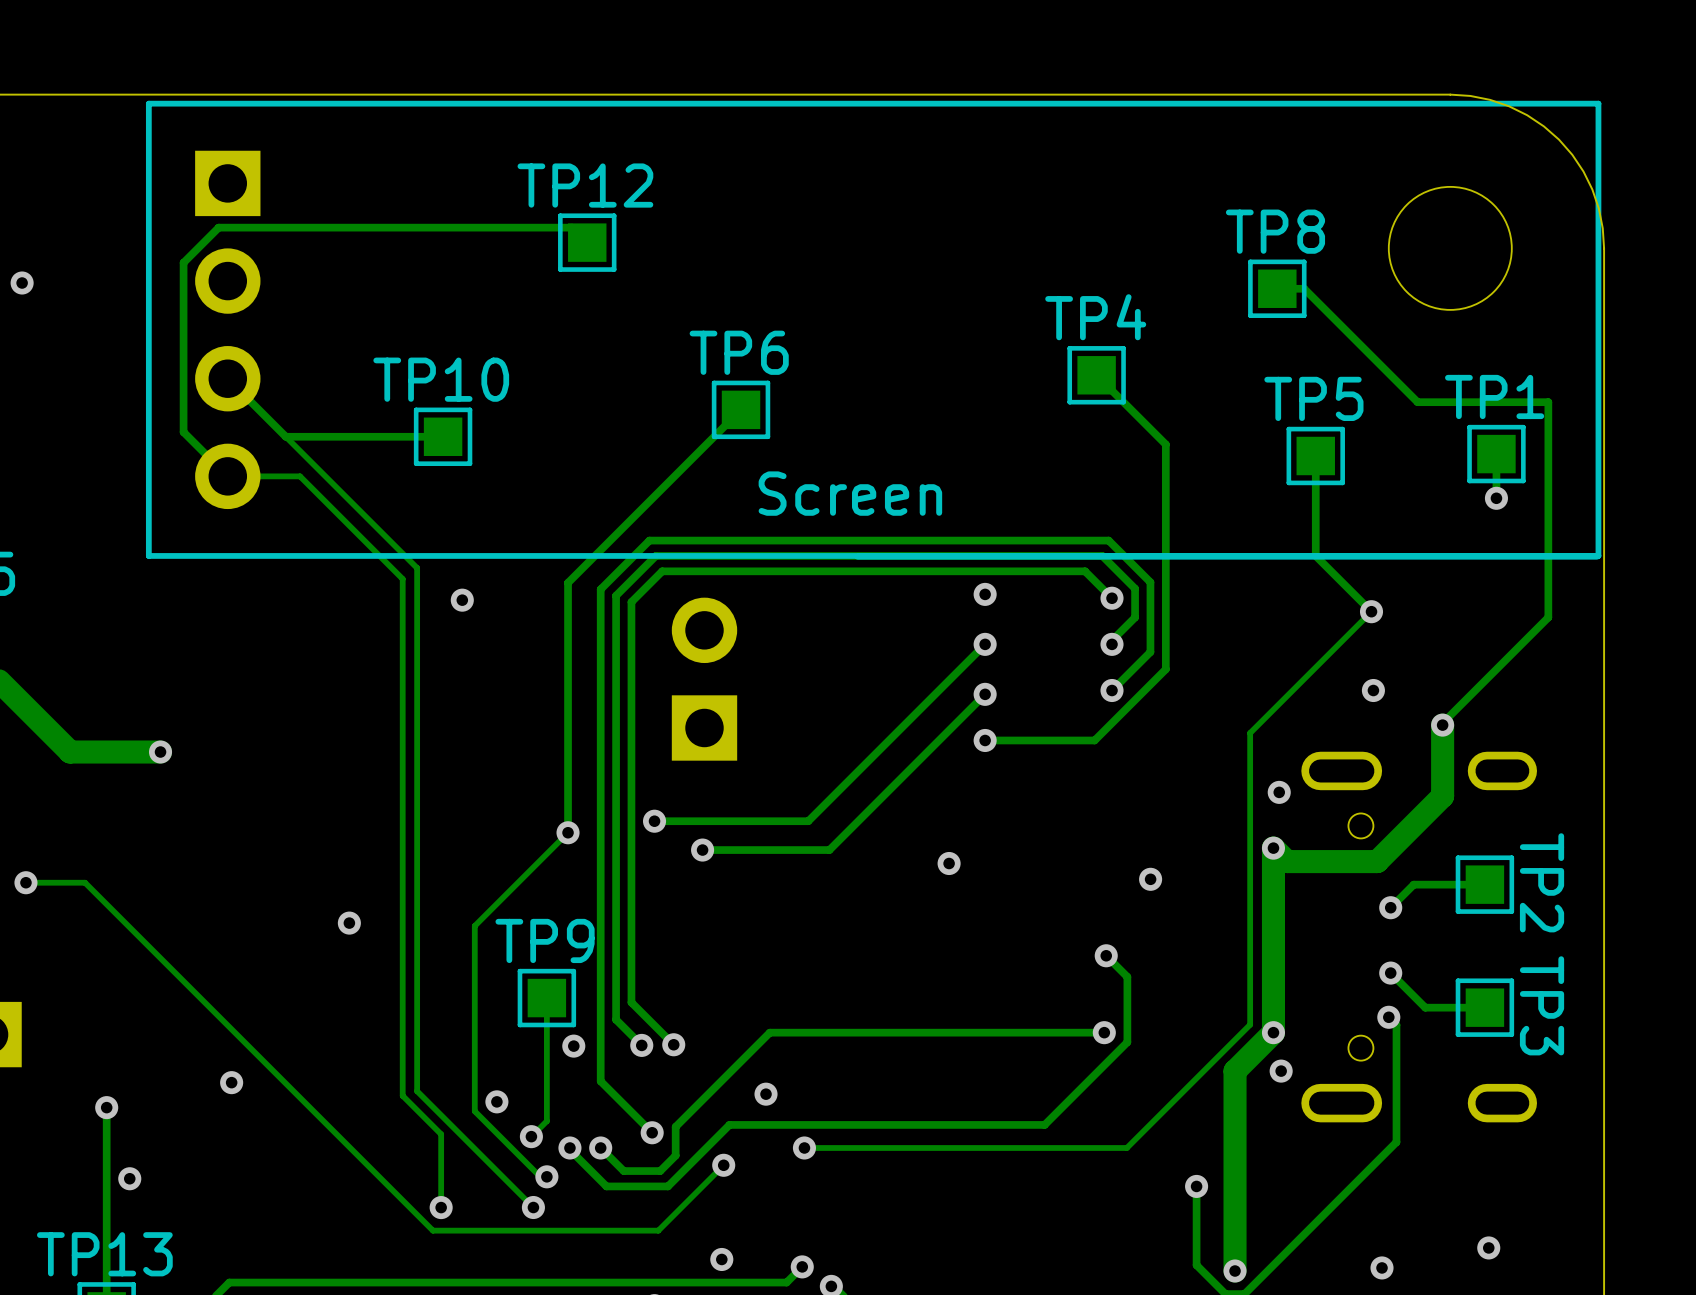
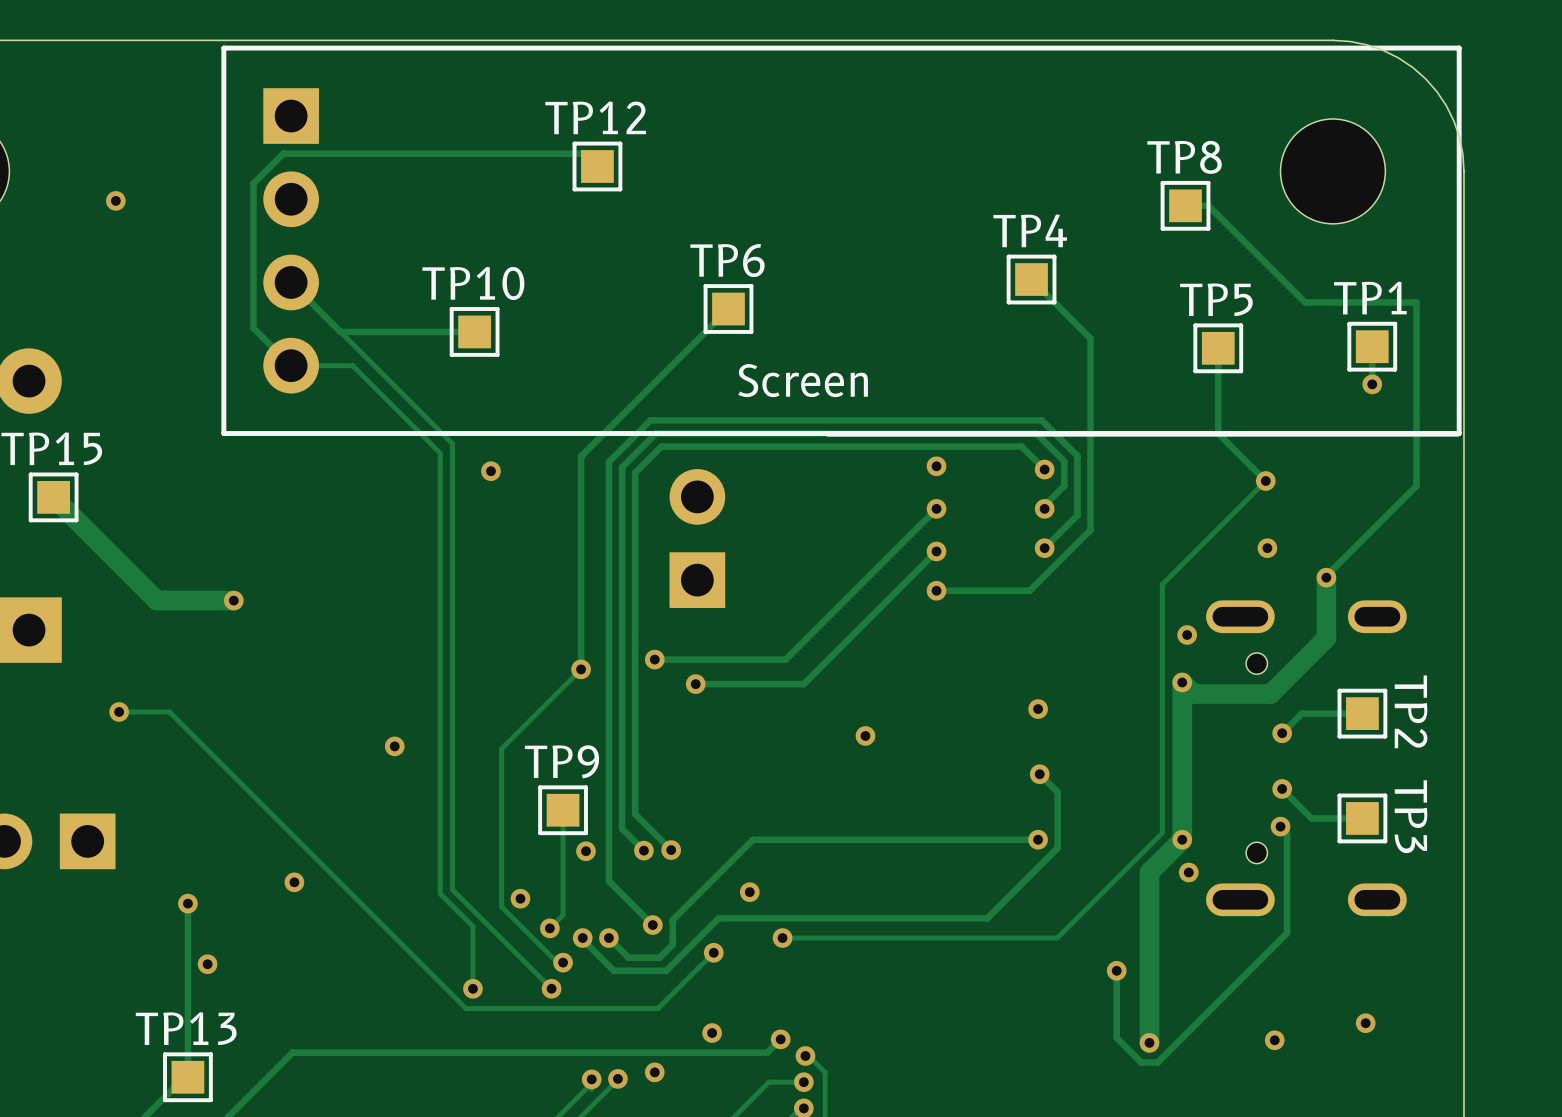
via position: (949, 863) -> (865, 735)
via position: (1150, 879) -> (1038, 709)

